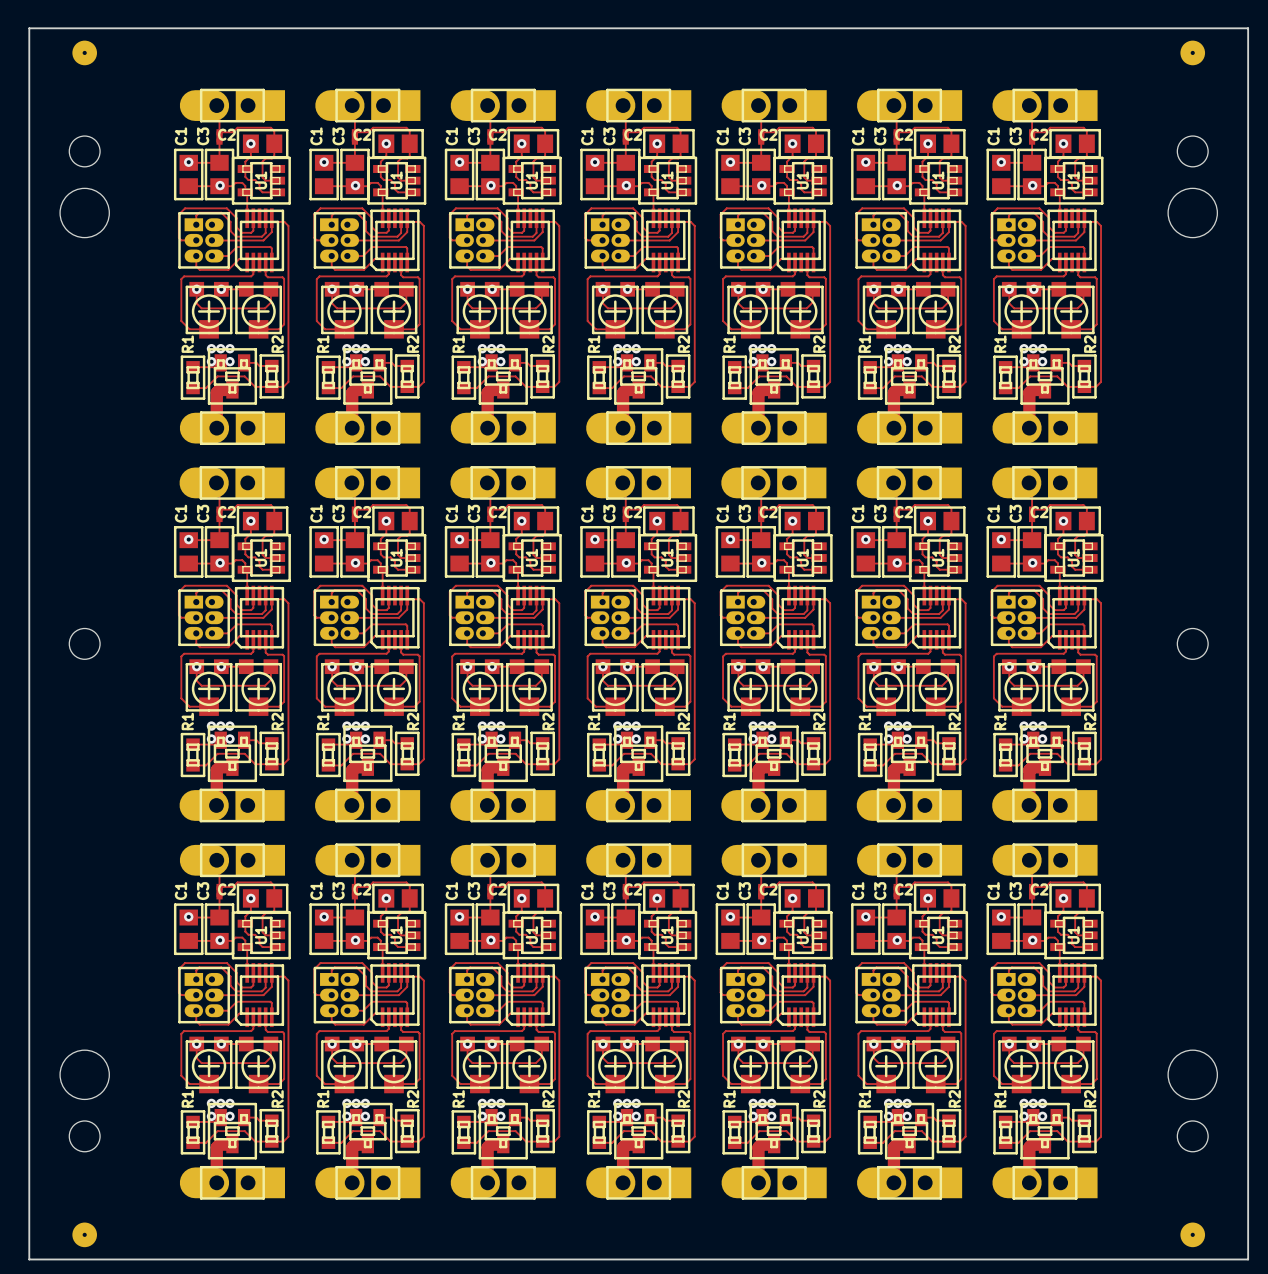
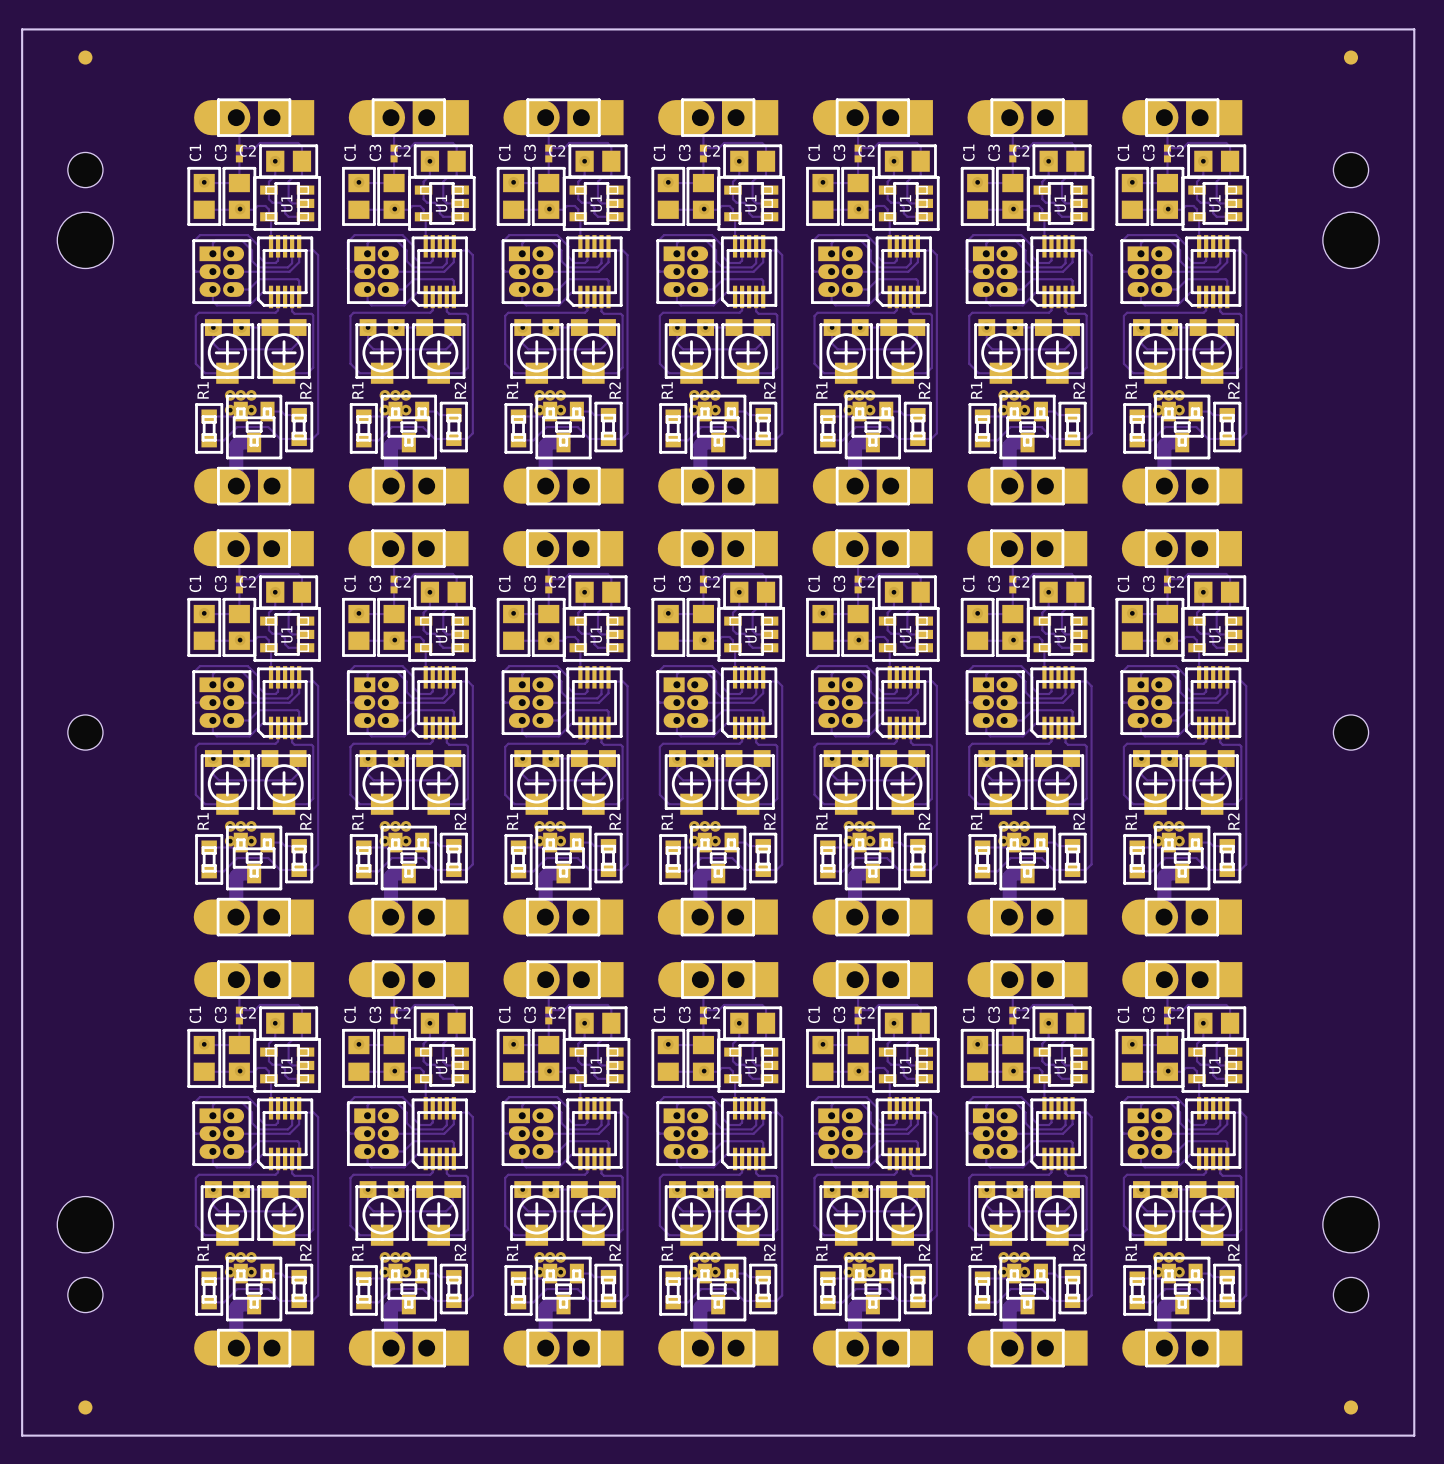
part footprint: [72, 40, 98, 66] -> [78, 50, 93, 65]
part footprint: [1180, 40, 1206, 66] -> [1343, 50, 1359, 65]
part footprint: [72, 1222, 98, 1248] -> [78, 1400, 93, 1415]
part footprint: [1180, 1222, 1206, 1248] -> [1343, 1400, 1359, 1415]

